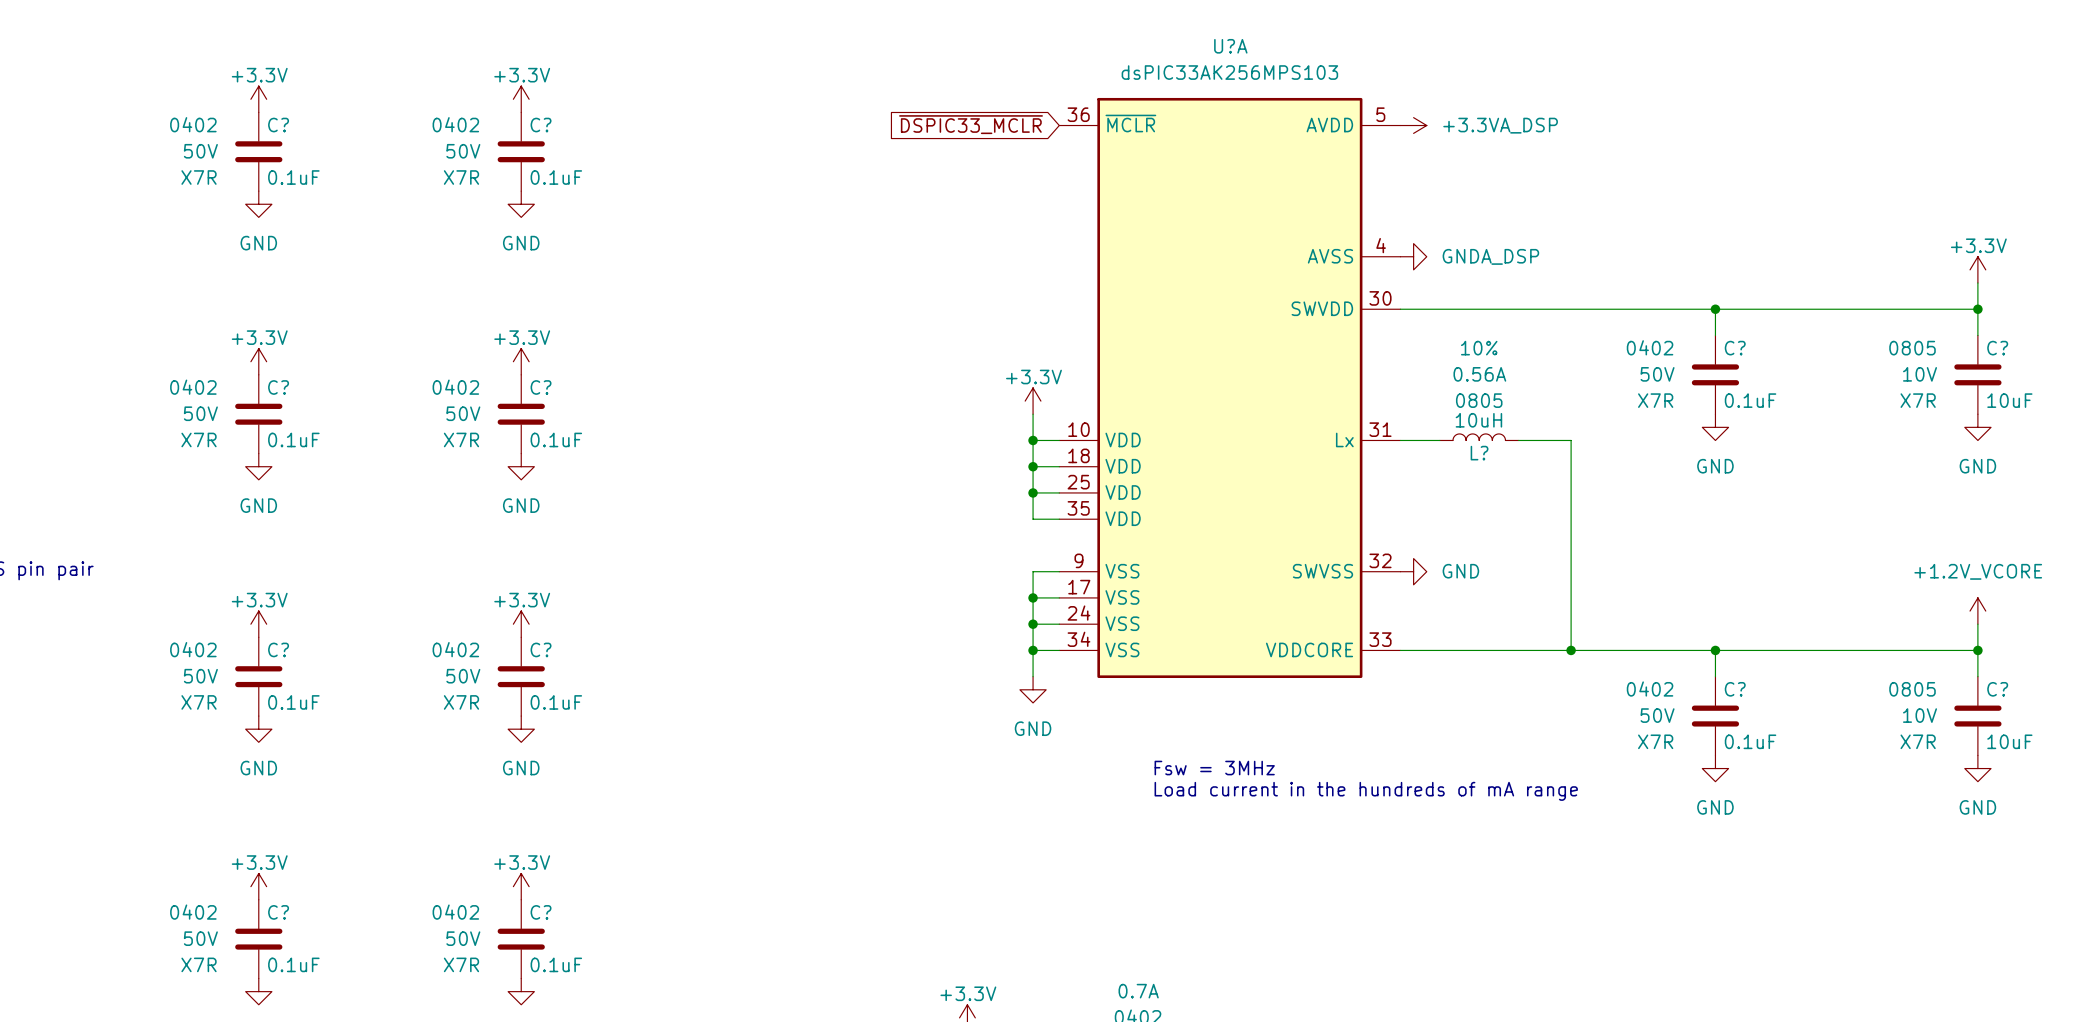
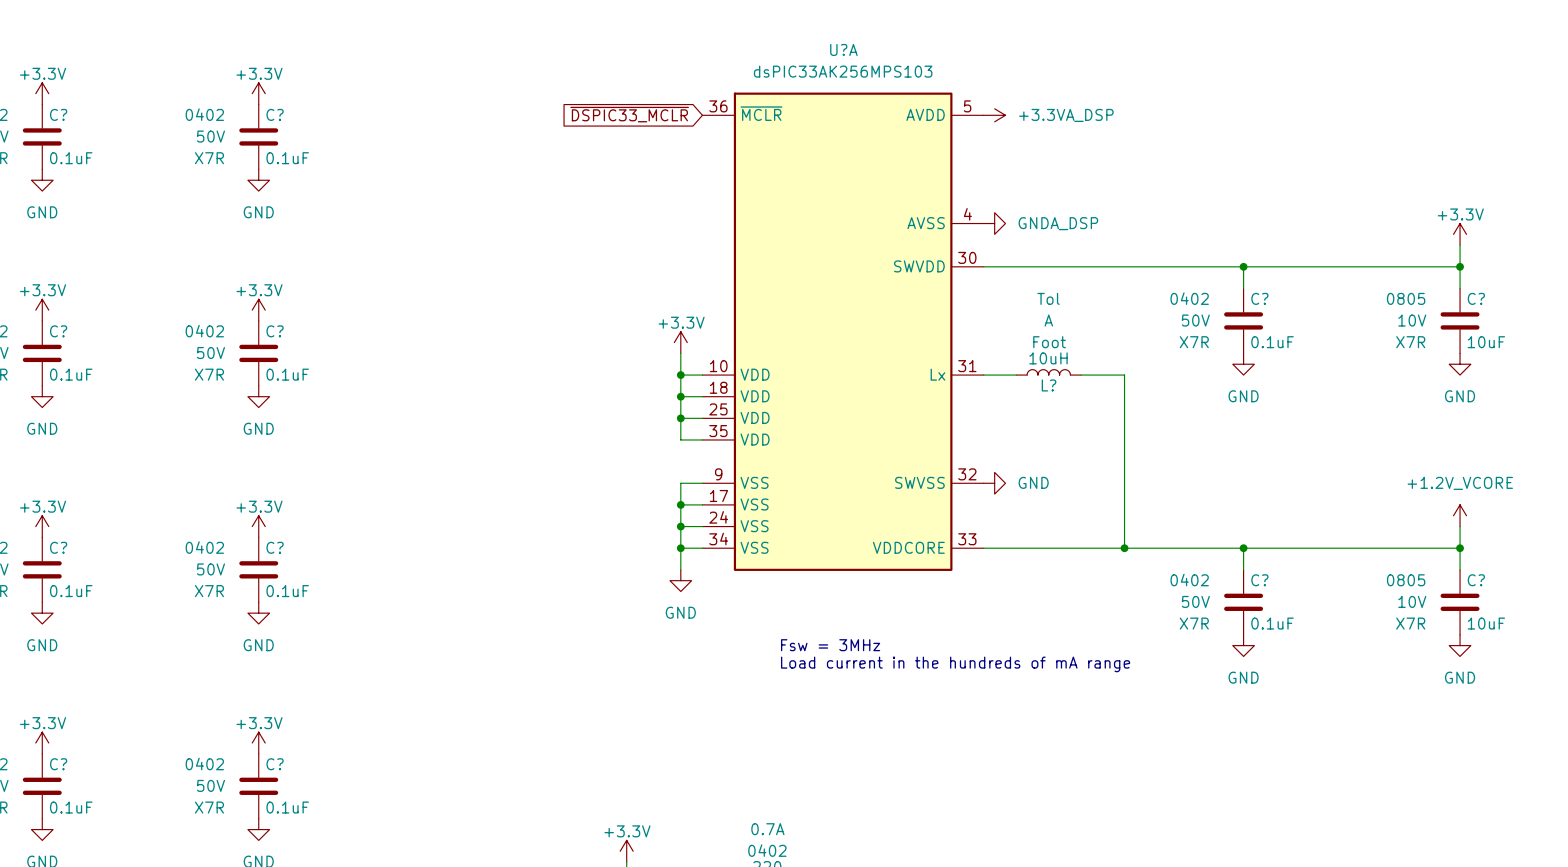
L? text: 10% (1479, 348) -> Tol (1048, 298)
L? text: 0.56A (1479, 374) -> A (1048, 320)
L? text: 0805 (1479, 400) -> Foot (1049, 342)

